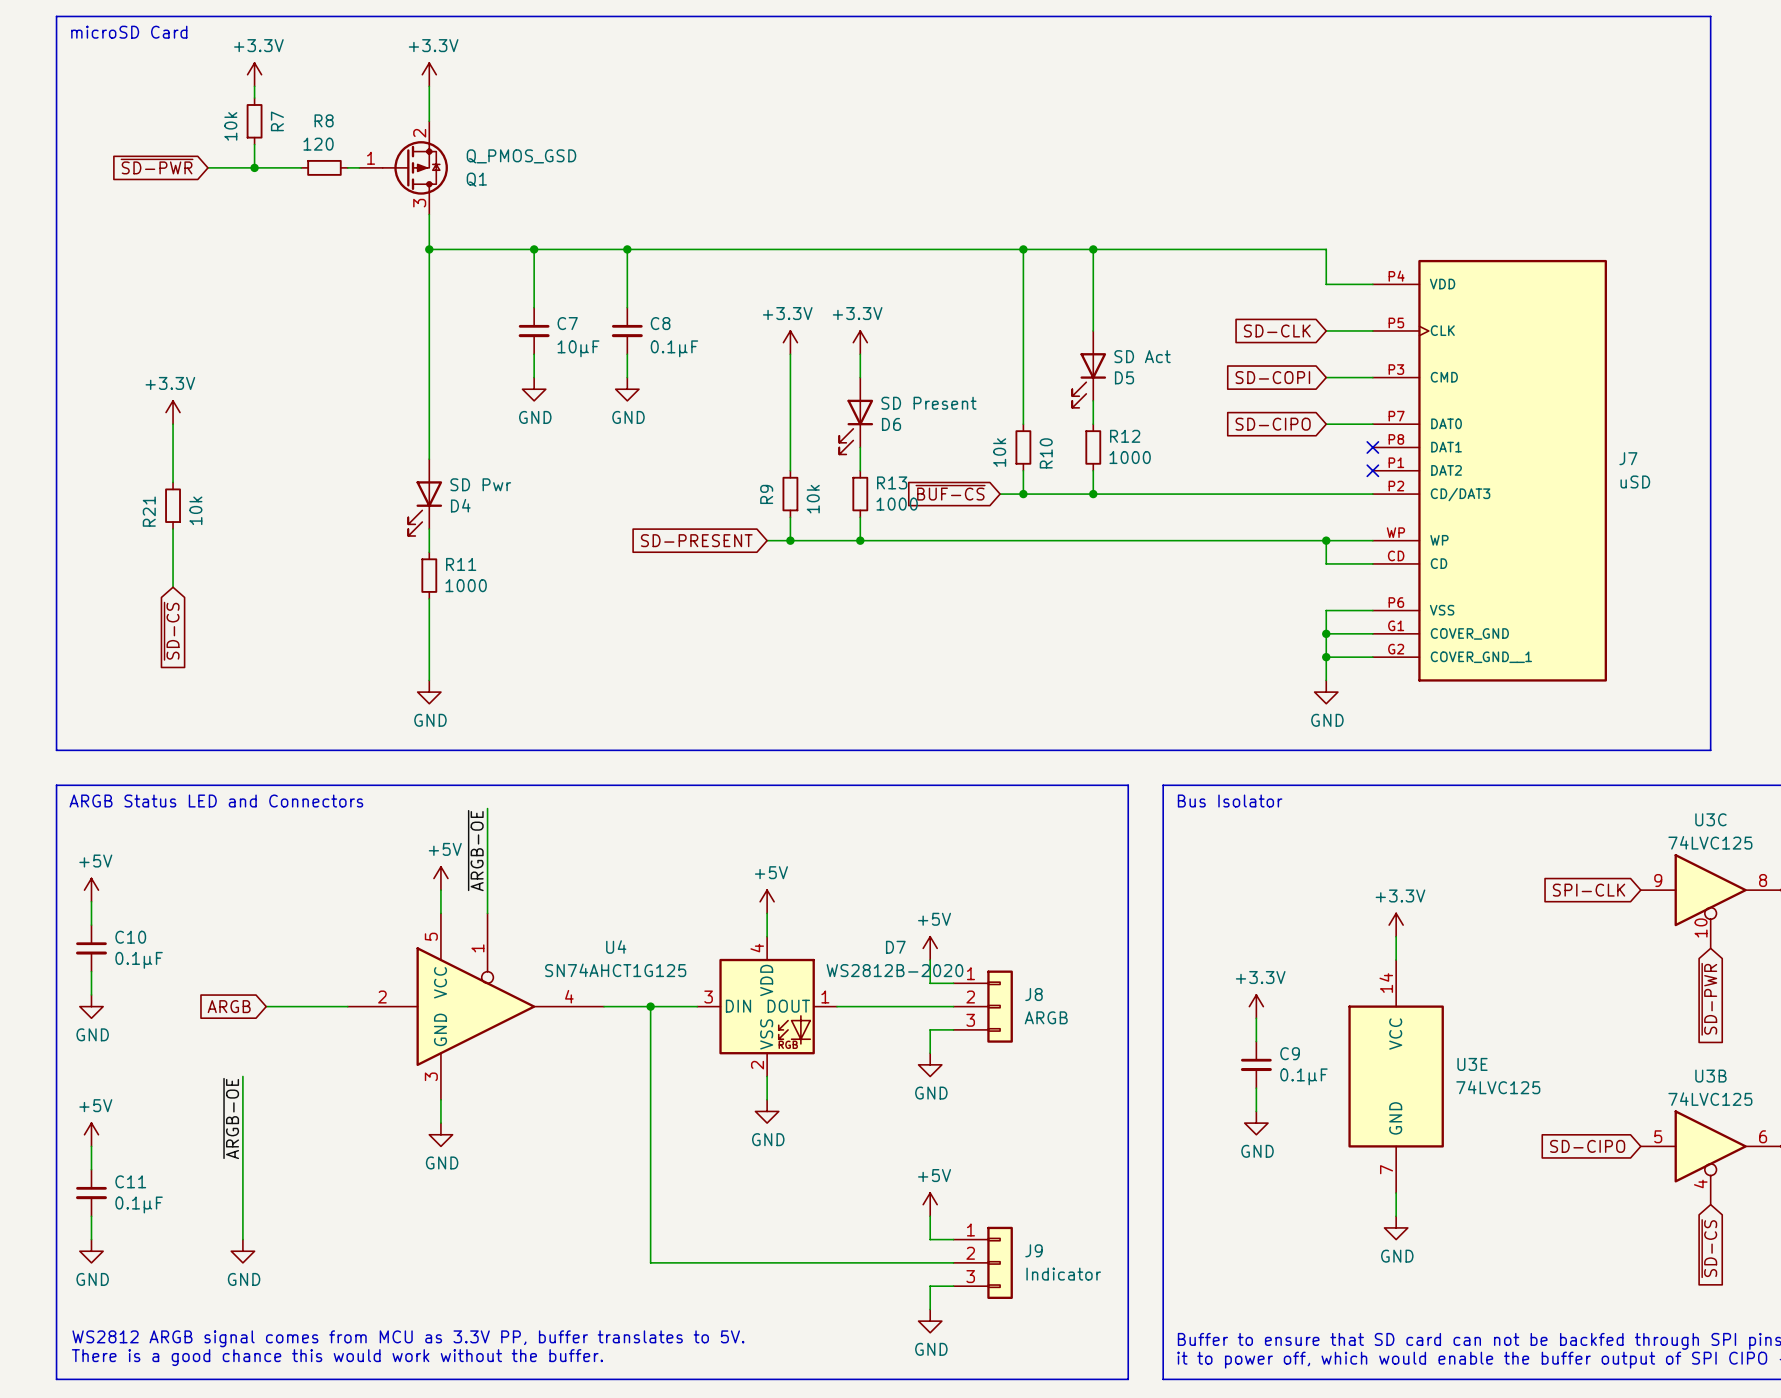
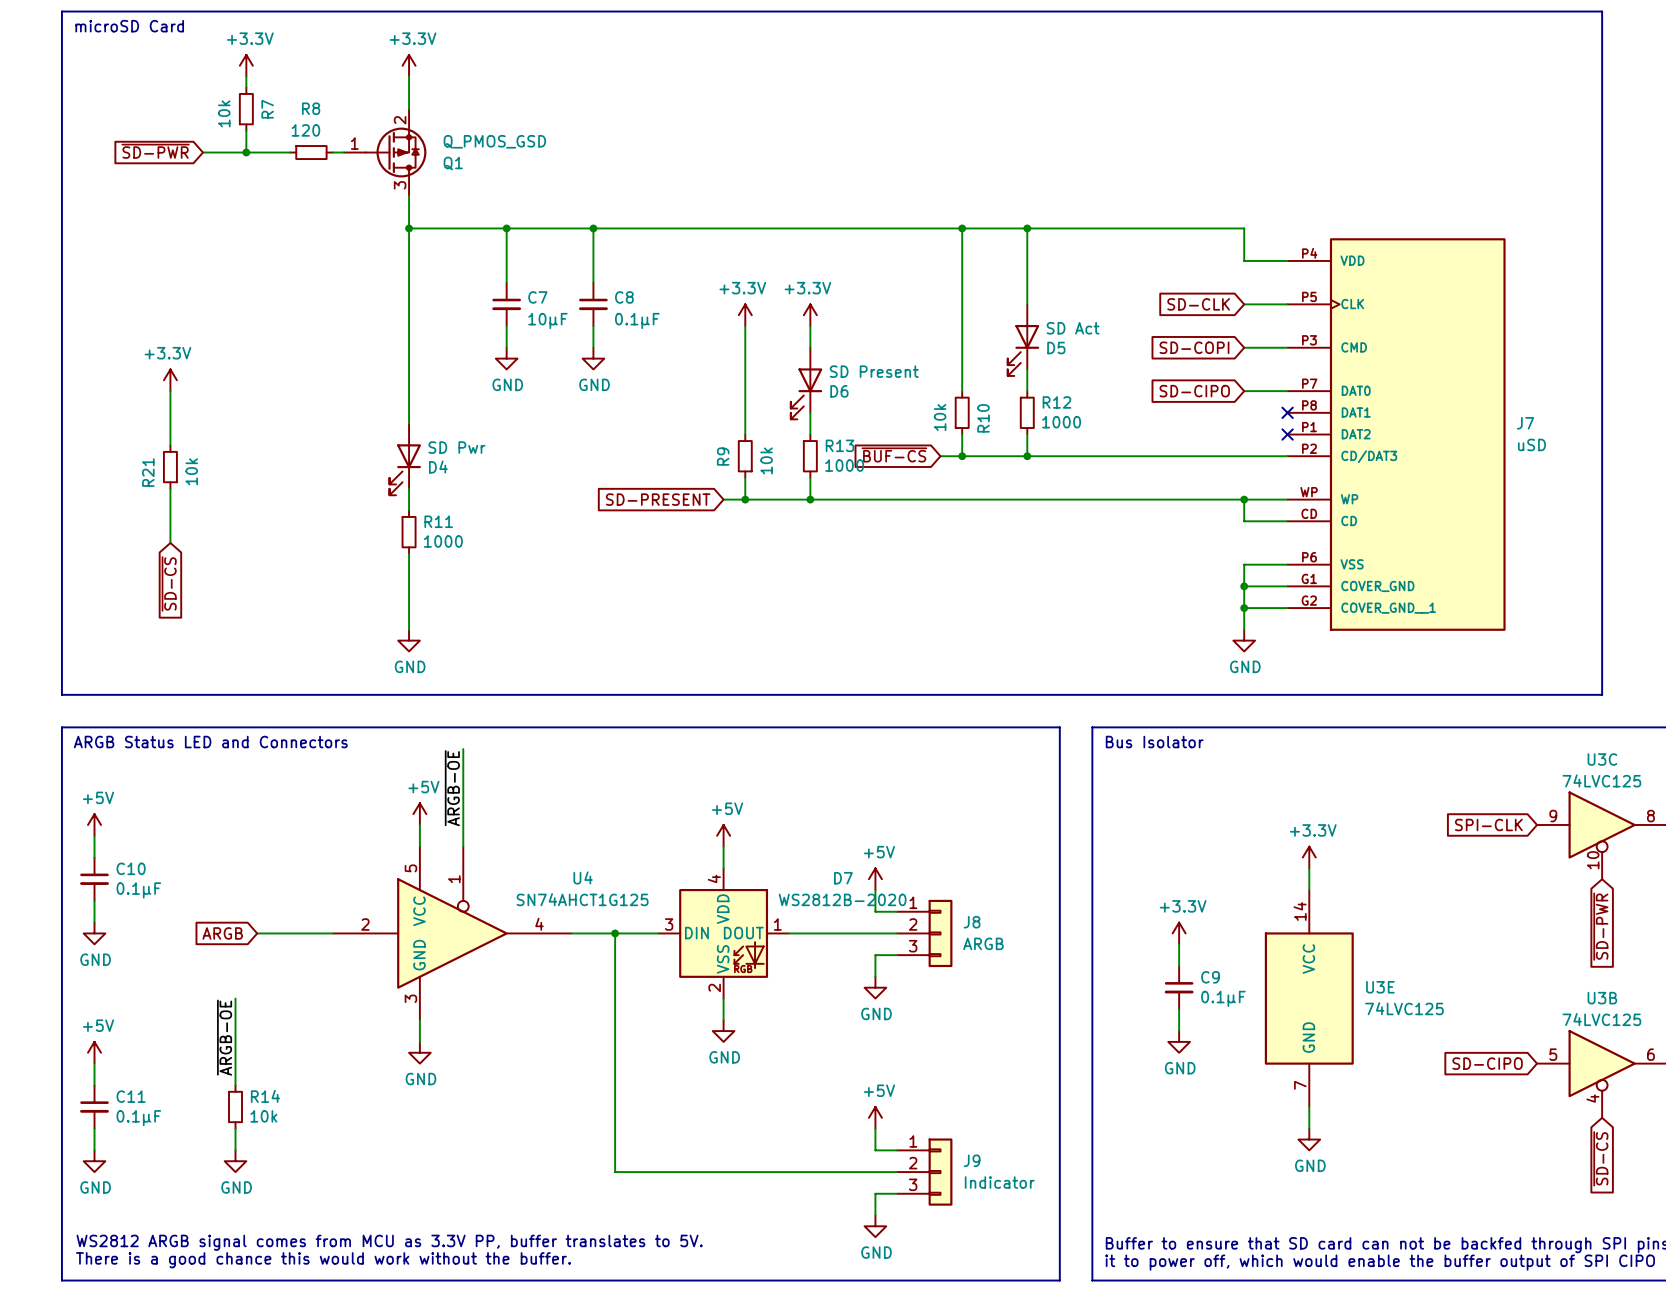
wire: (242, 1169) (242, 1216) -> none
R14: none -> 10k (235, 1106)

